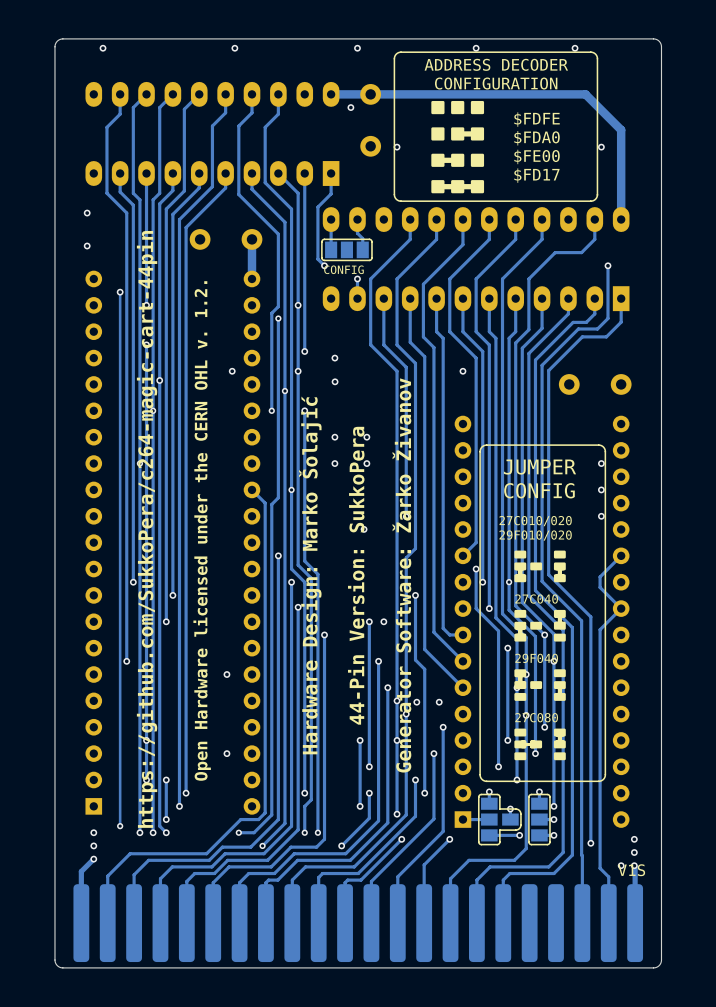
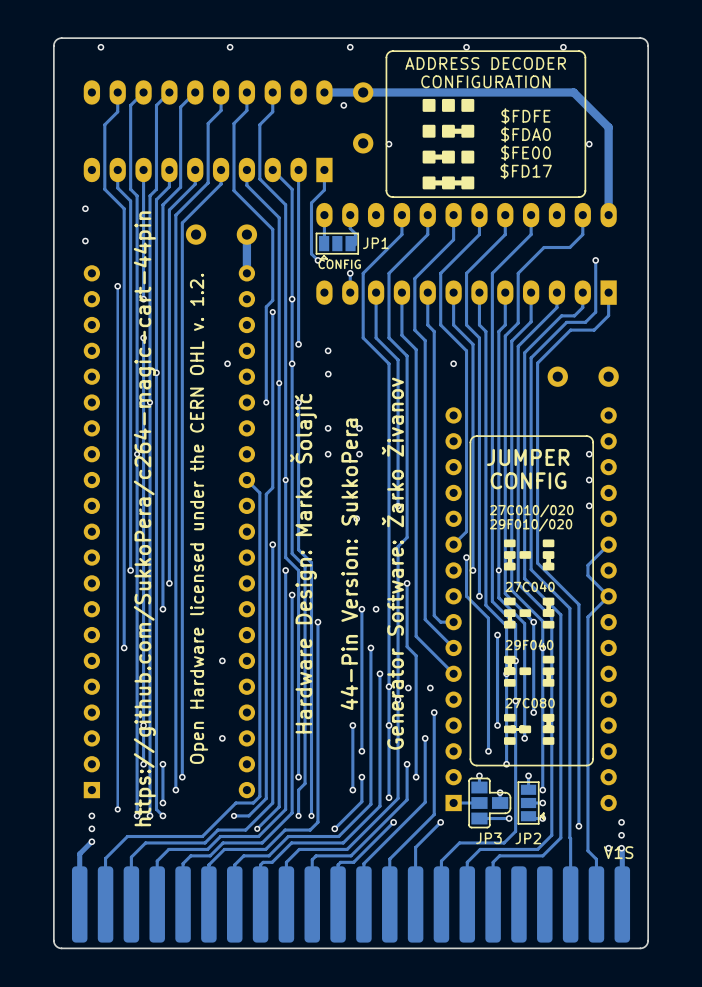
part: (346, 249) -> none
JP1: none -> (337, 246)
part: (539, 819) -> none
JP2: none -> (531, 803)
JP3 name: none -> JP3 (488, 838)

